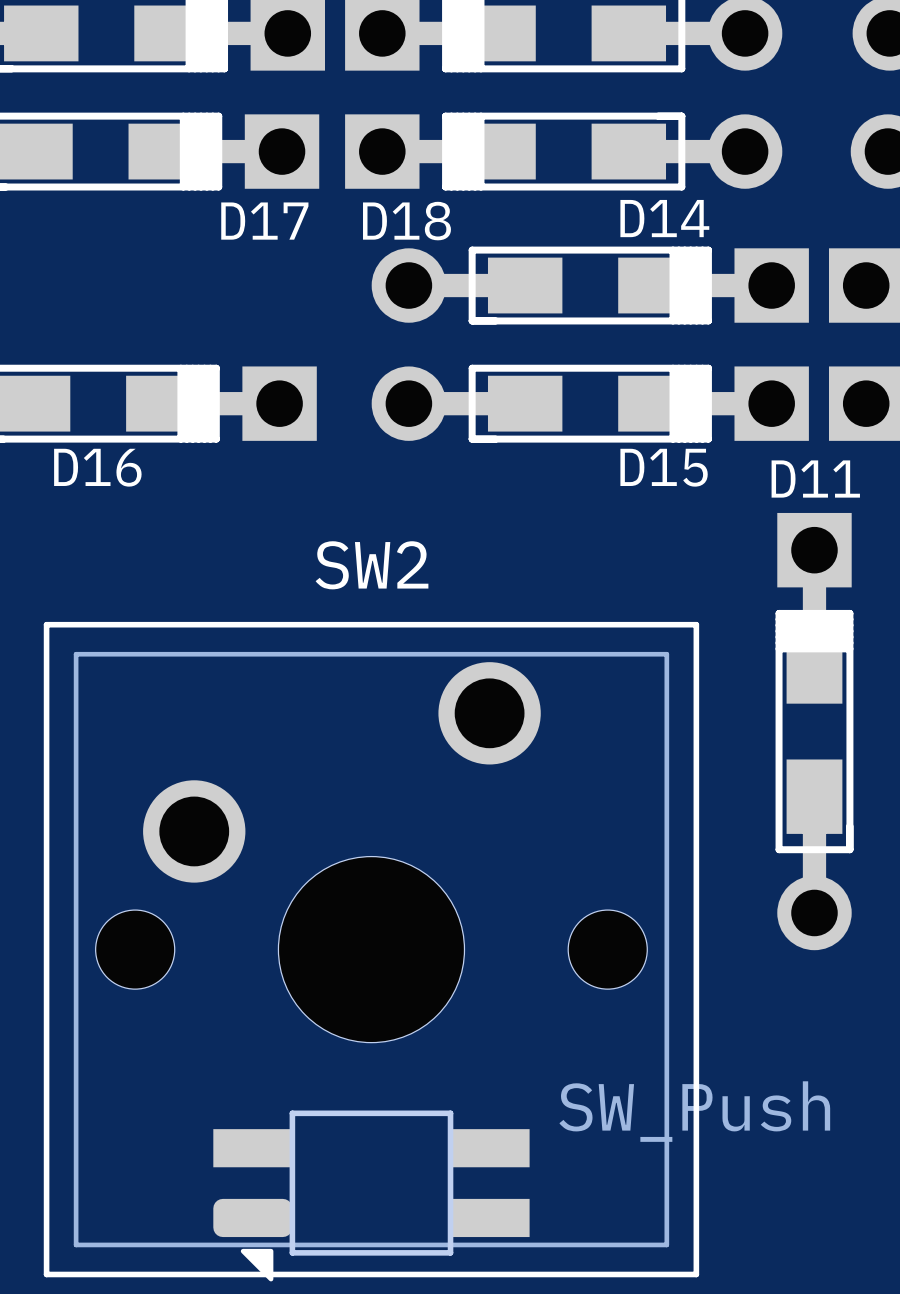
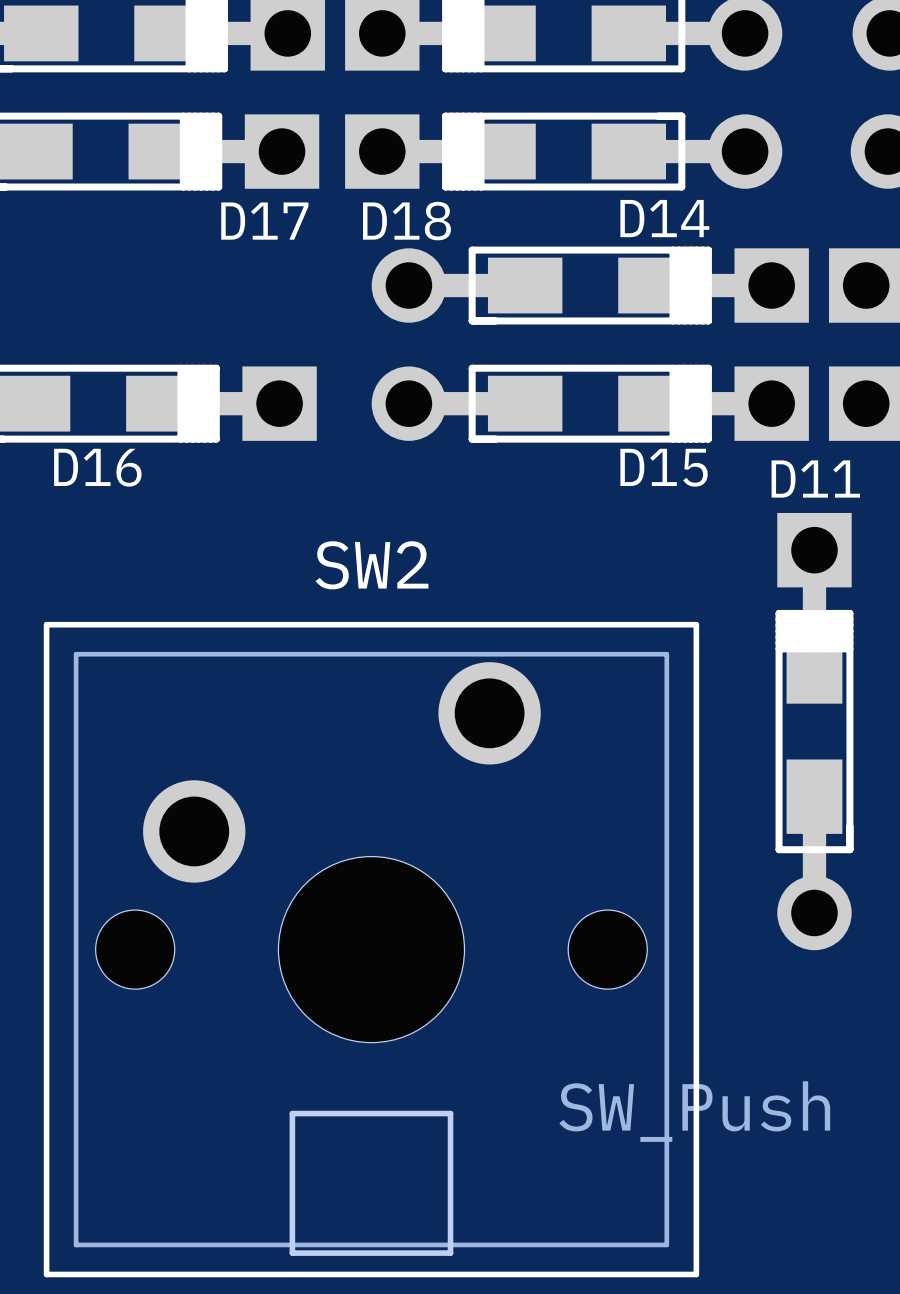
SW2 footprint: [43, 621, 700, 1282] -> [43, 621, 700, 1278]

